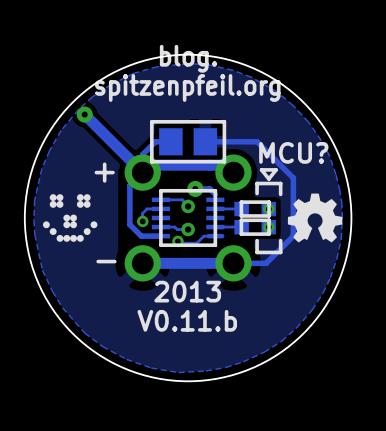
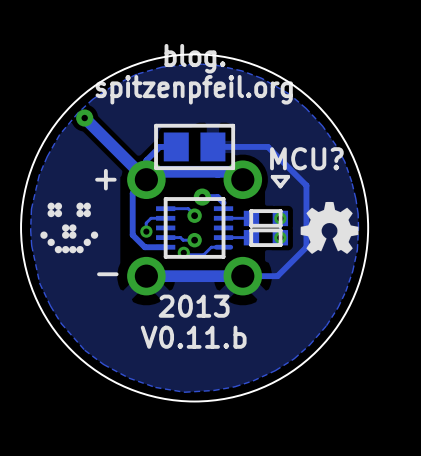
line: (257, 193) (257, 183) (280, 183) (280, 194) -> none
line: (280, 240) (280, 252) (257, 252) (257, 240) -> none

